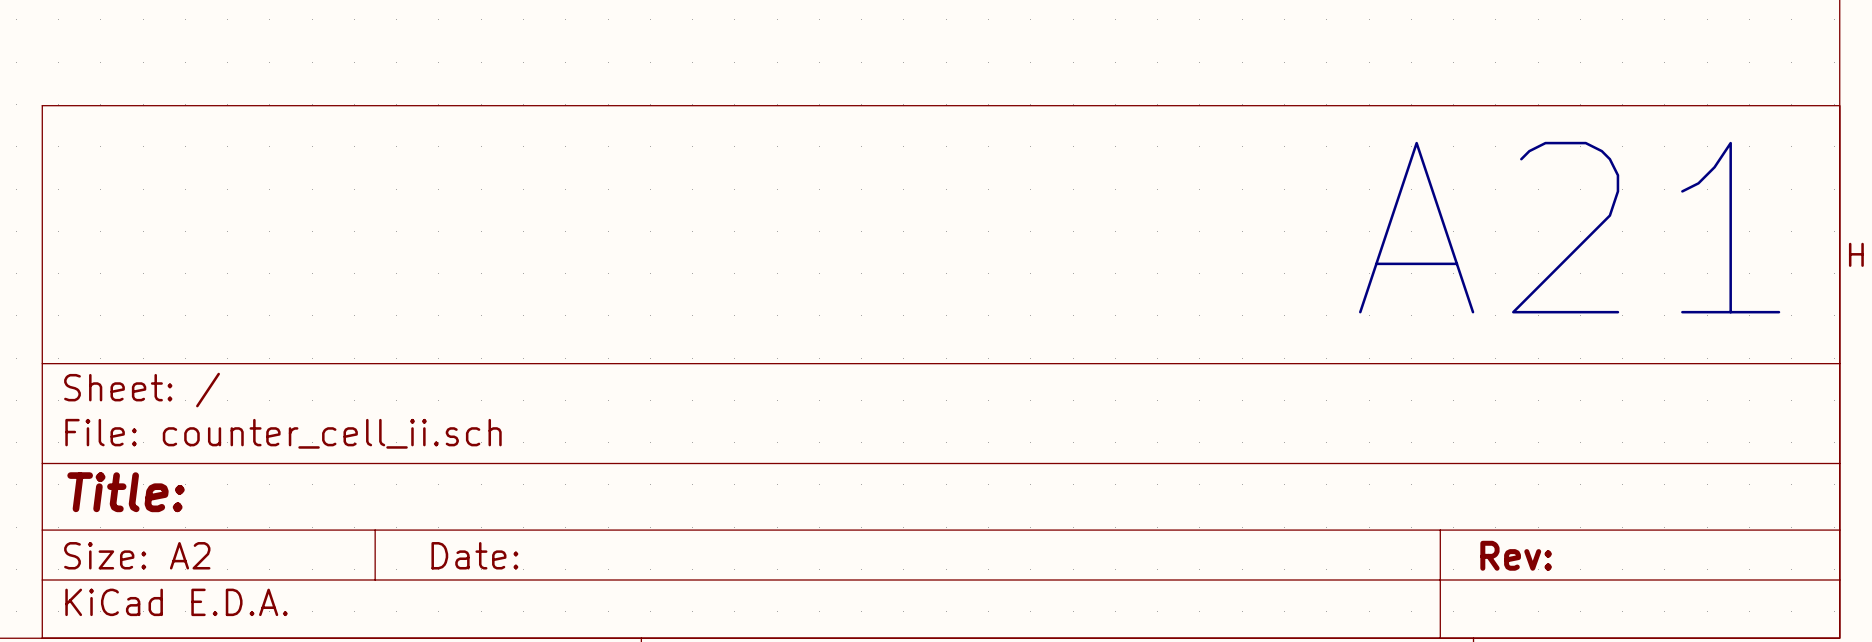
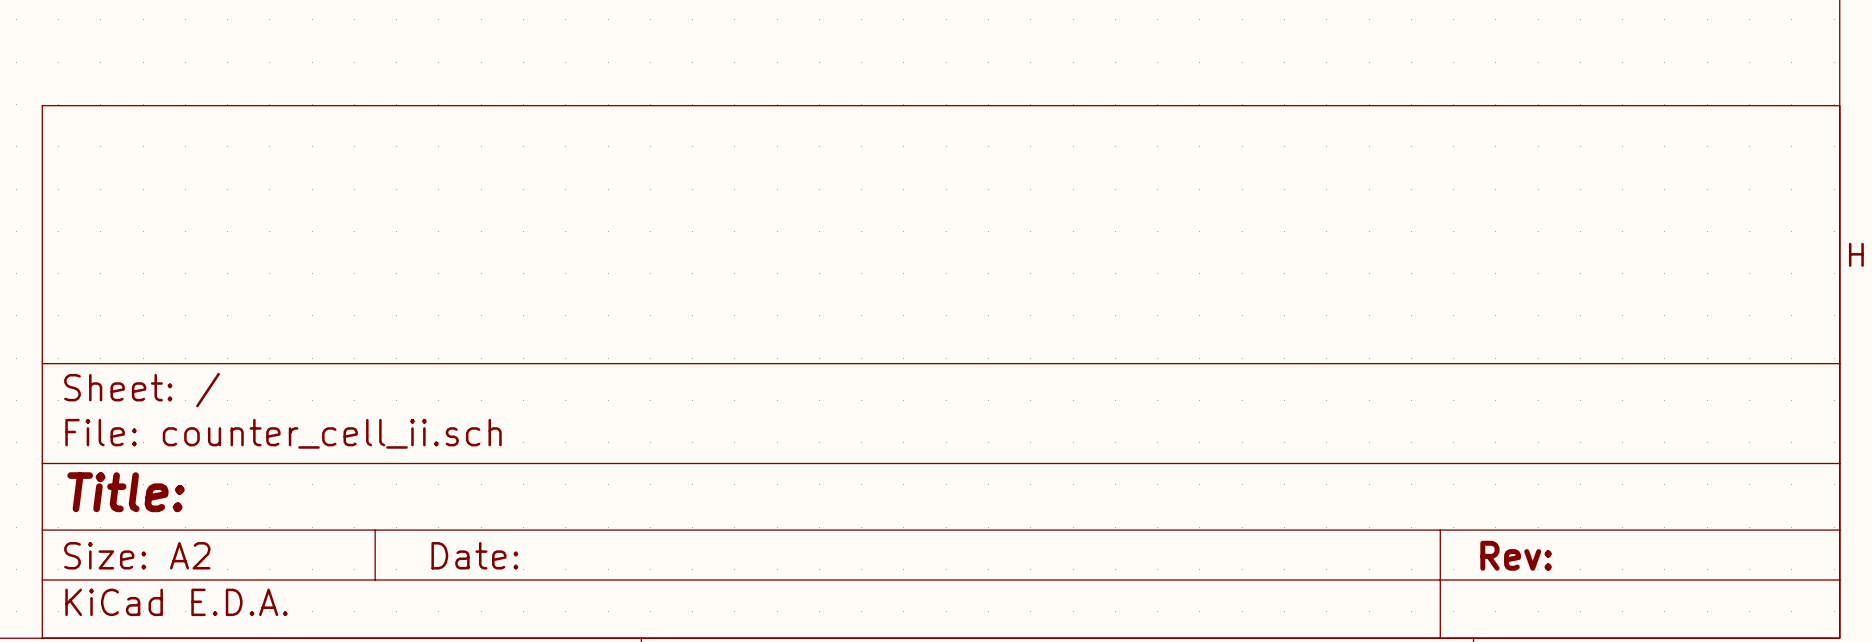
text: A21 (1569, 227) -> none

